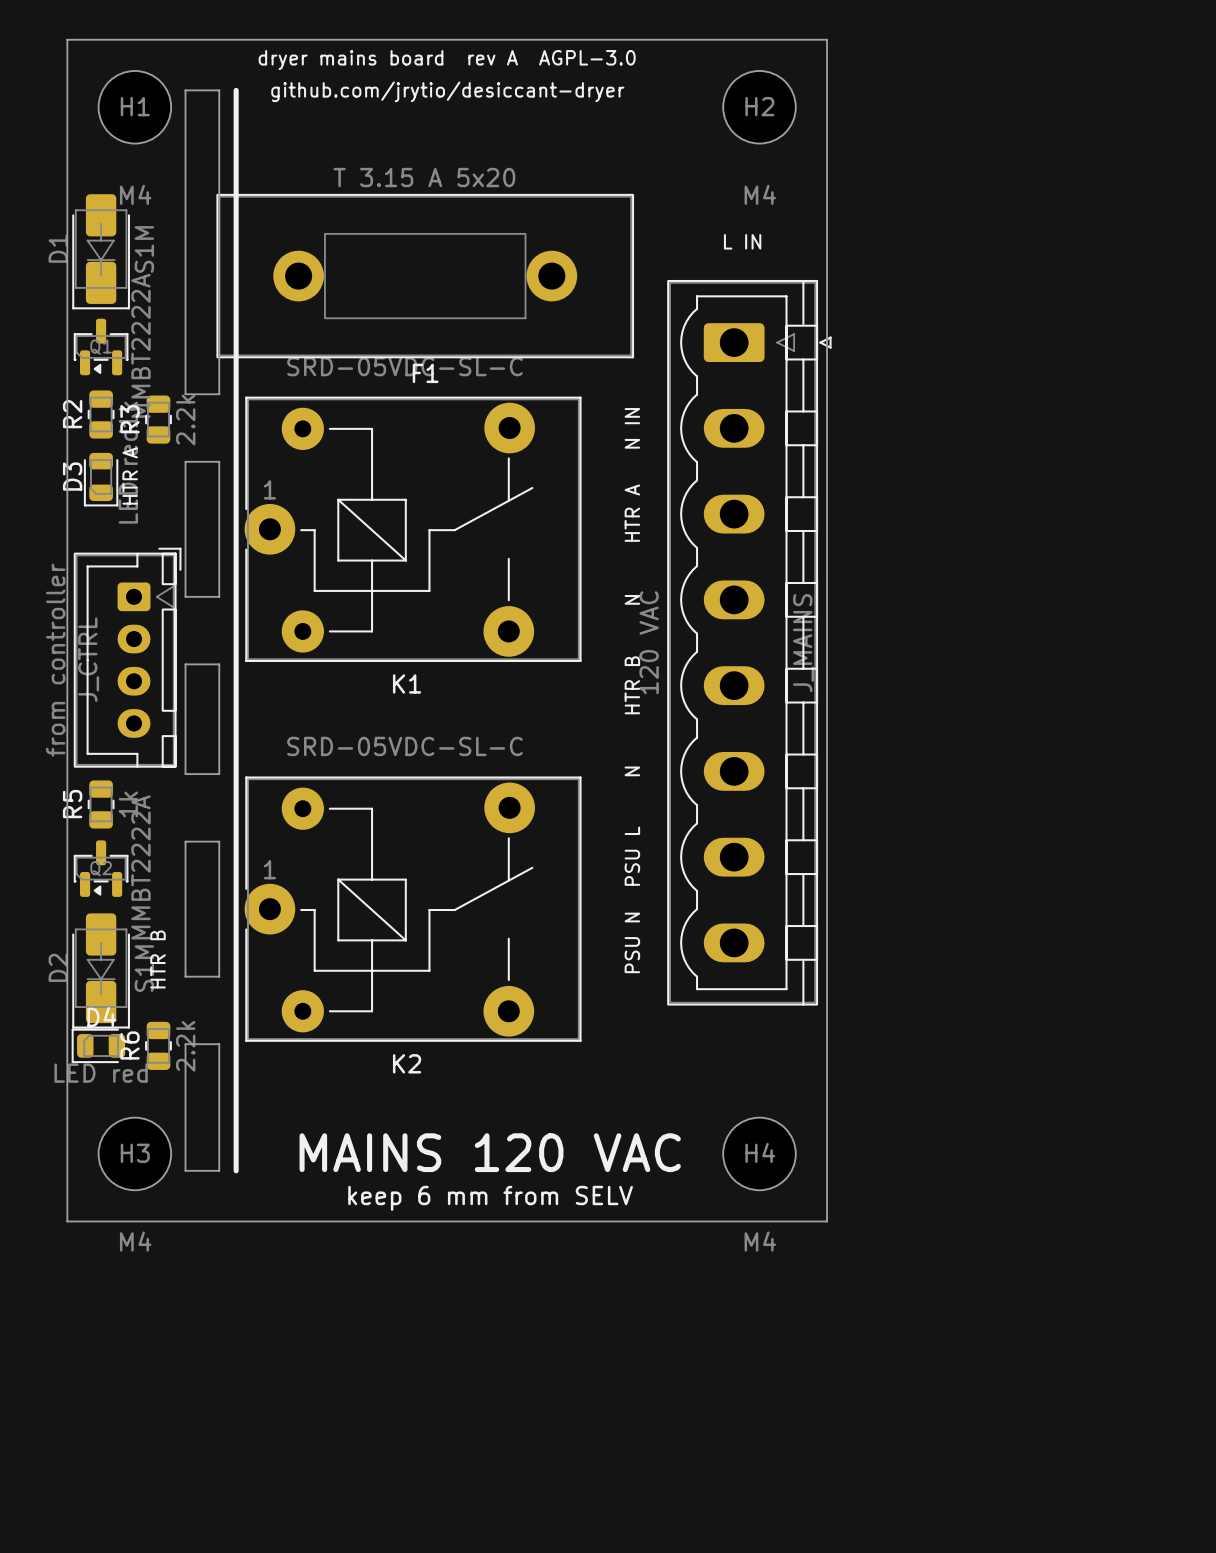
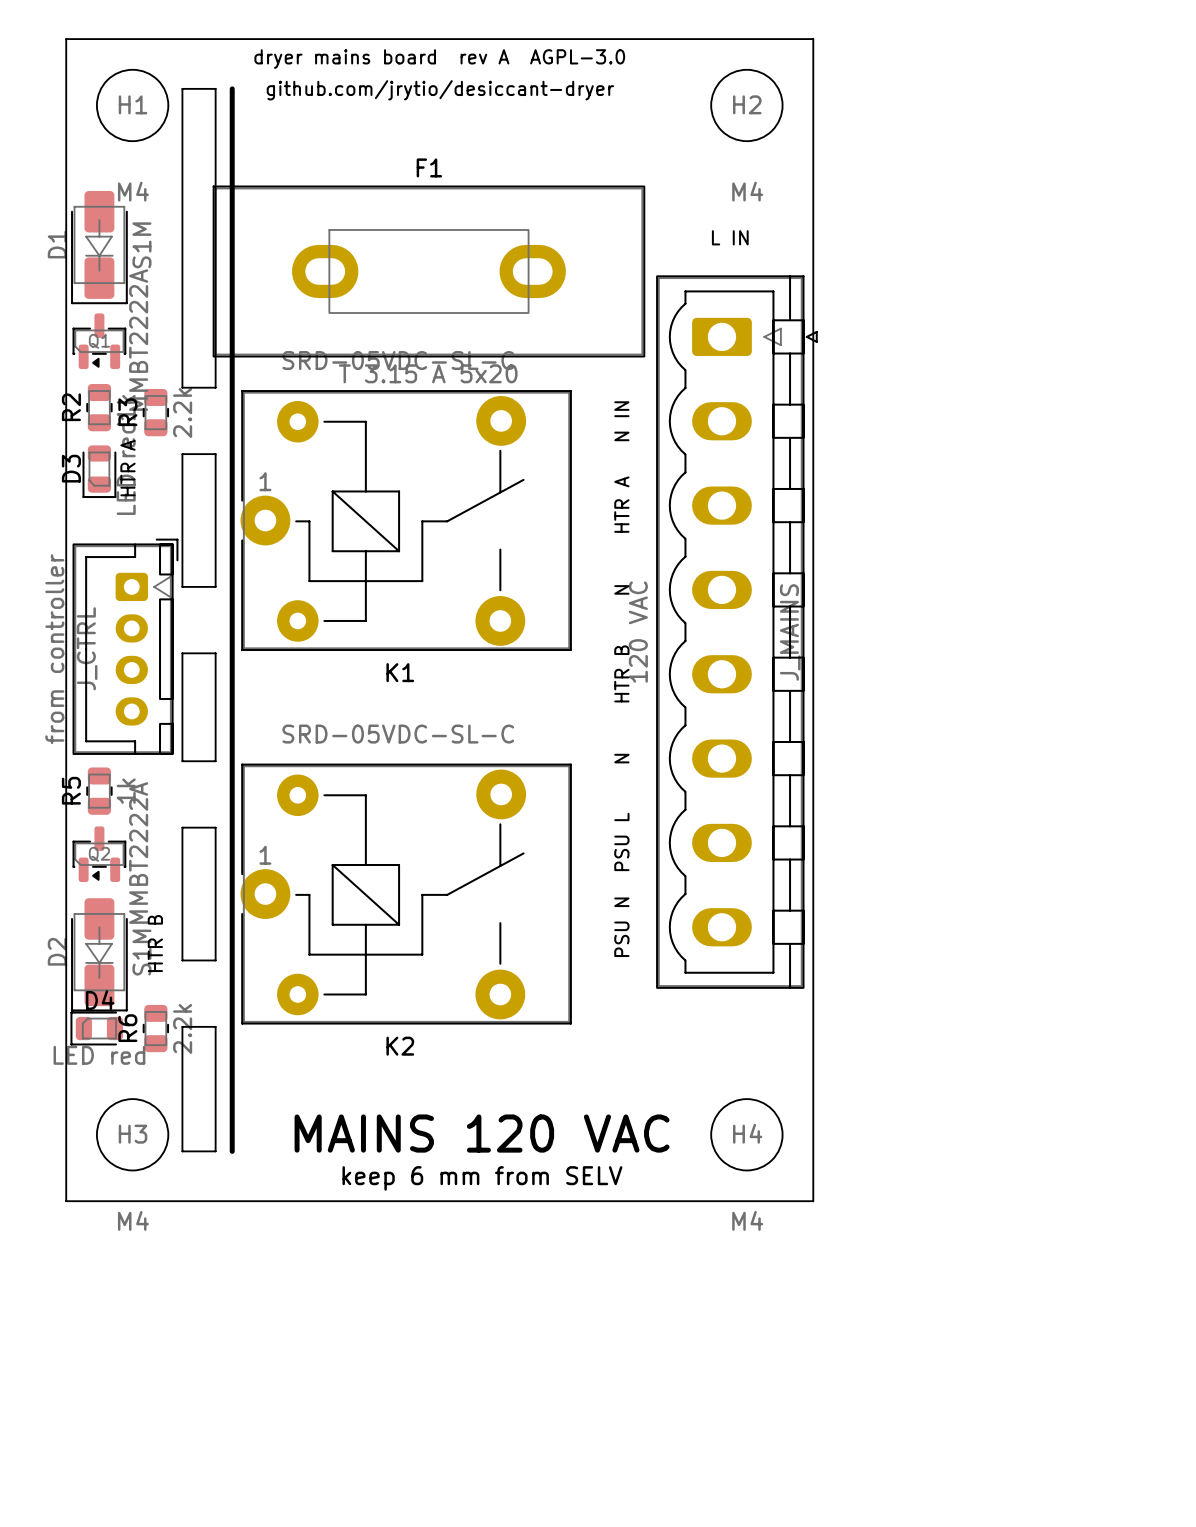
F1 value position: T 3.15 A 5x20 (424, 177) -> T 3.15 A 5x20 (428, 373)
F1 footprint: [216, 193, 635, 359] -> [212, 185, 646, 358]
F1 name position: F1 (425, 373) -> F1 (429, 167)

